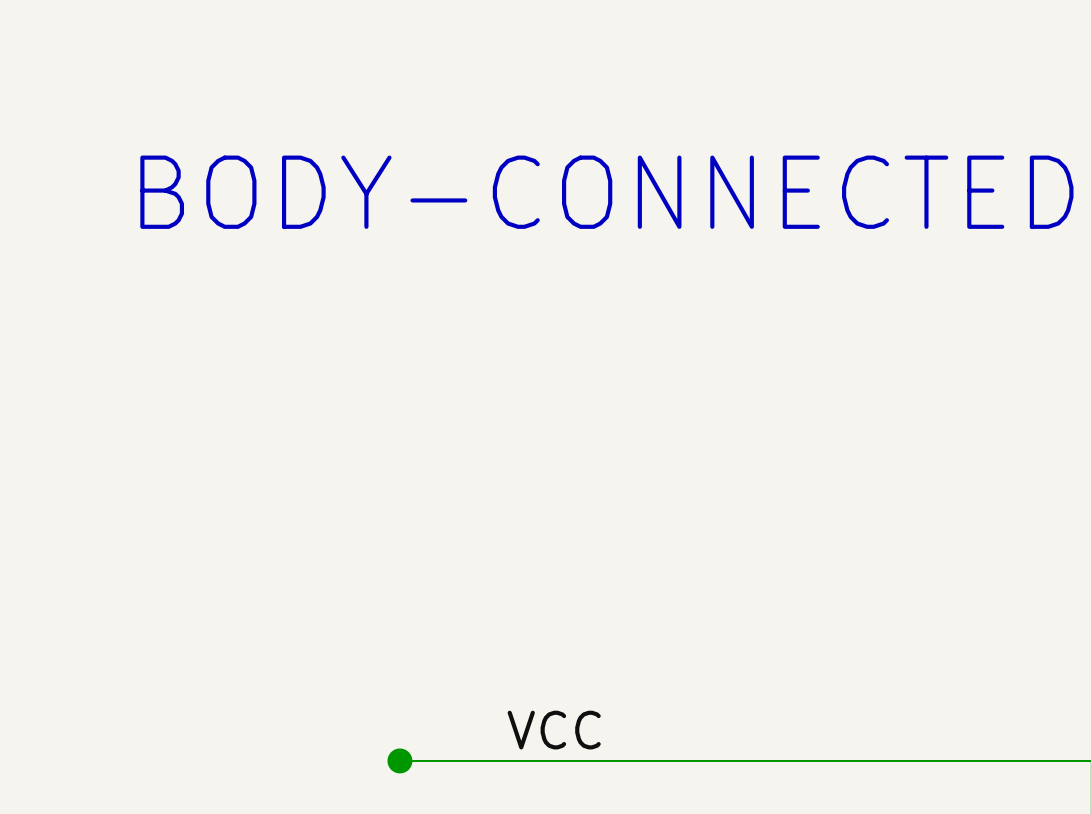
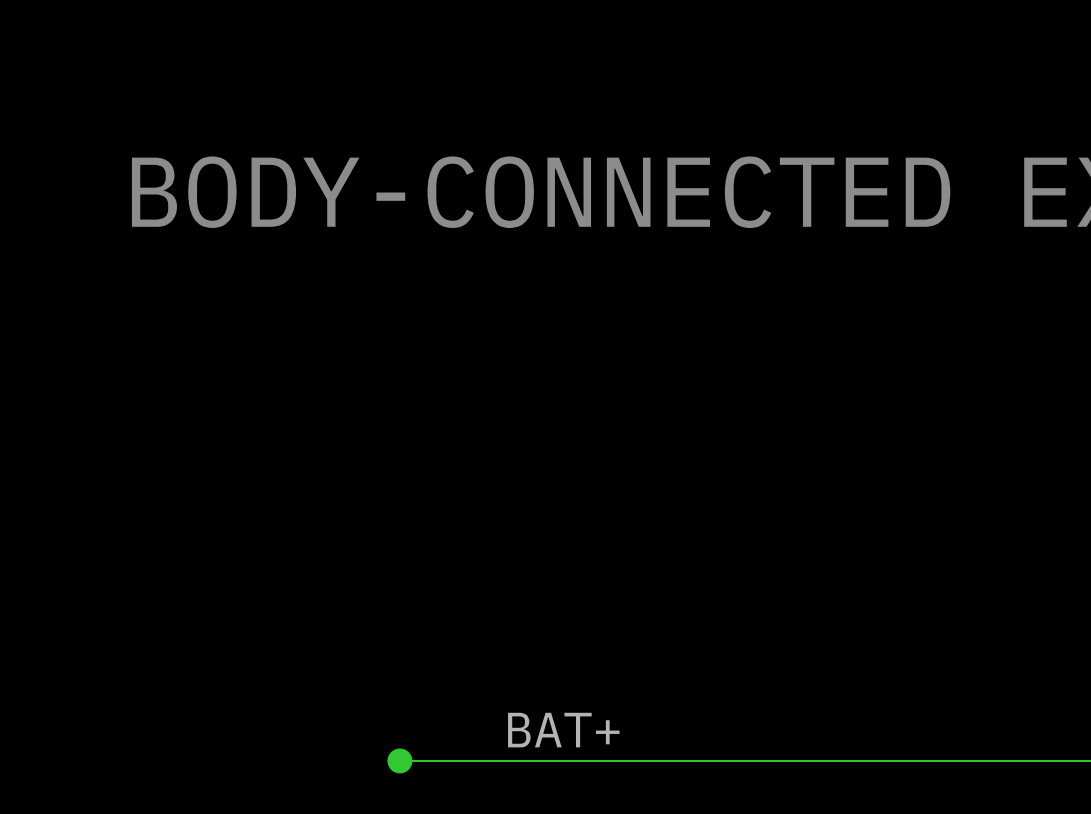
label: VCC (554, 730) -> BAT+ (563, 730)

